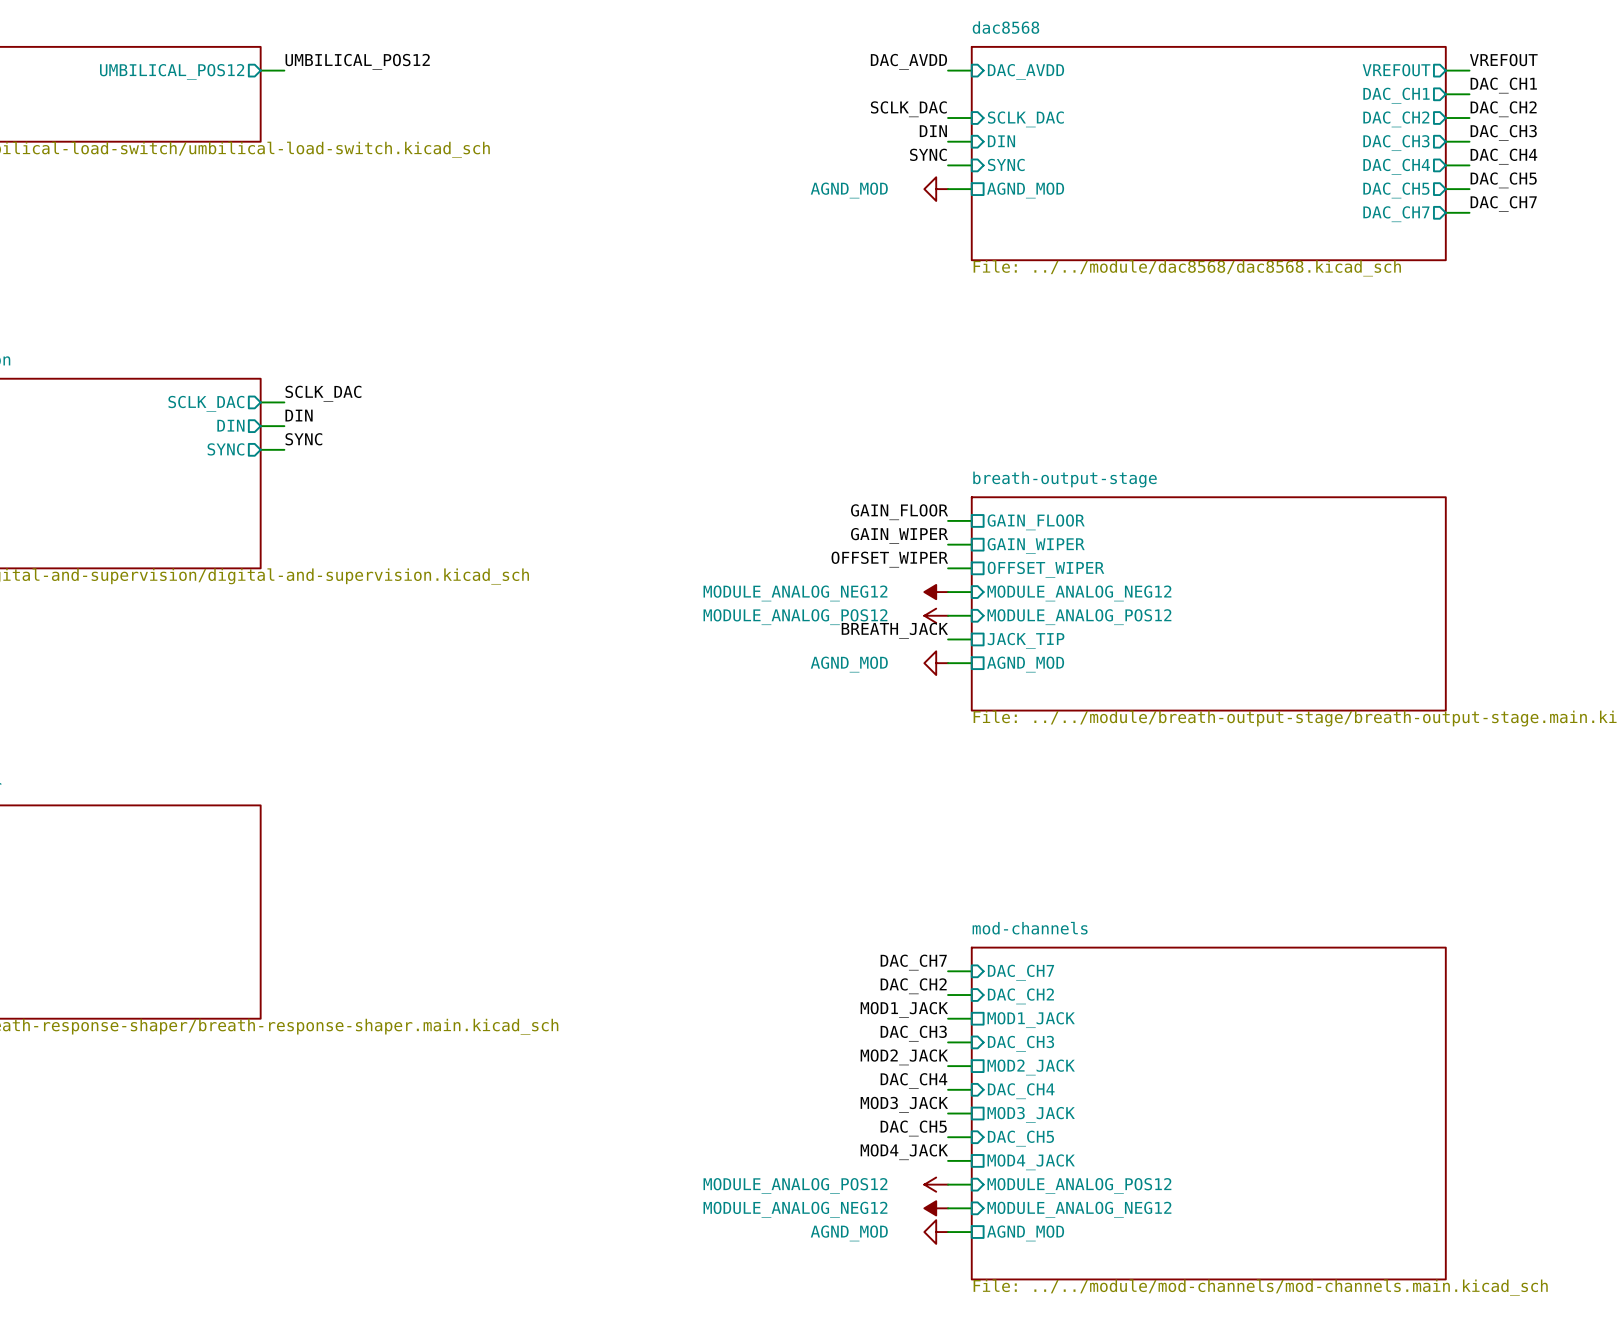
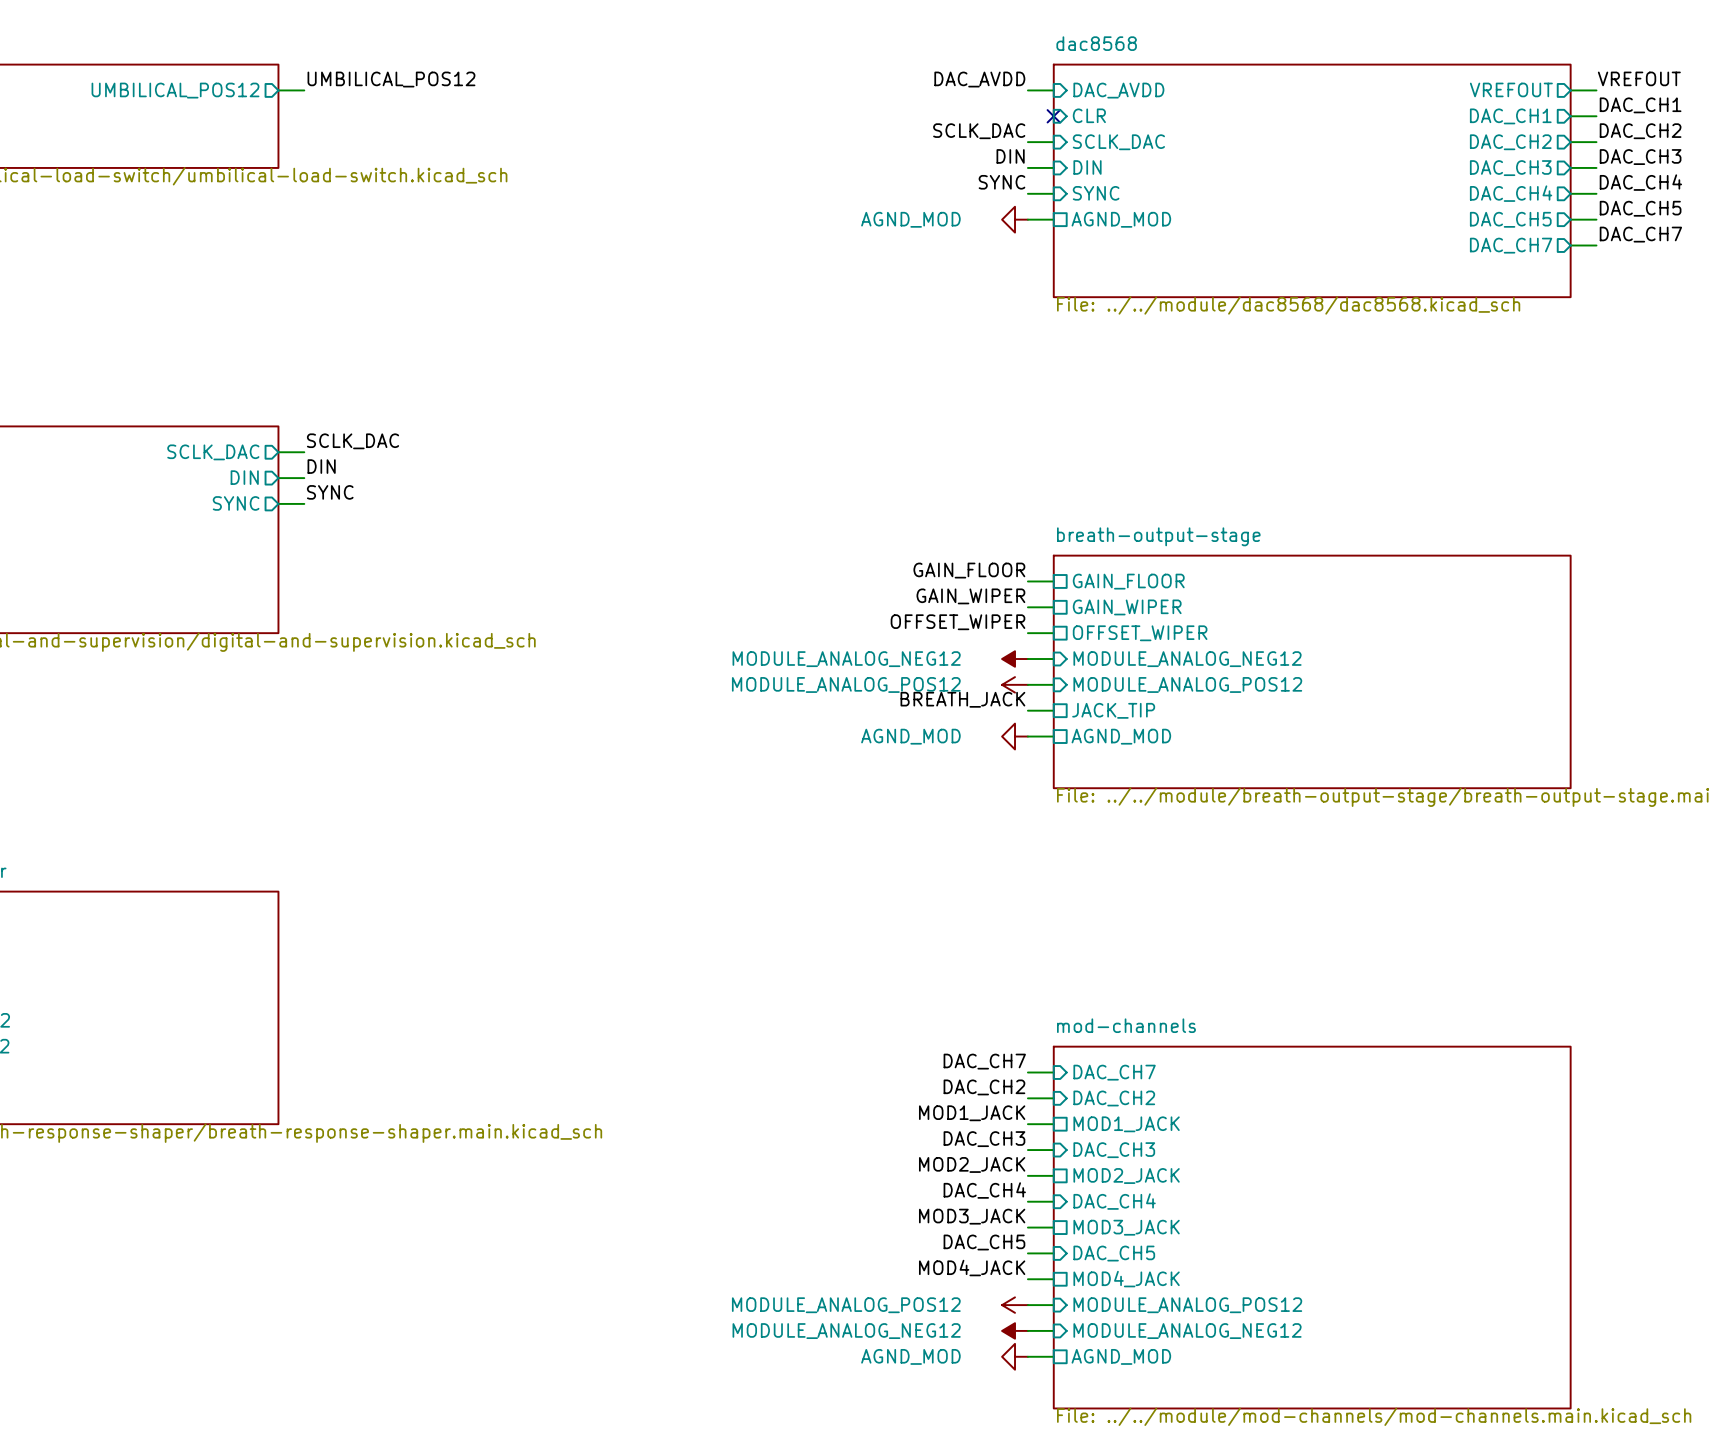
sheet pin: none -> CLR (1089, 115)
no-connect mark: none -> (1053, 116)

